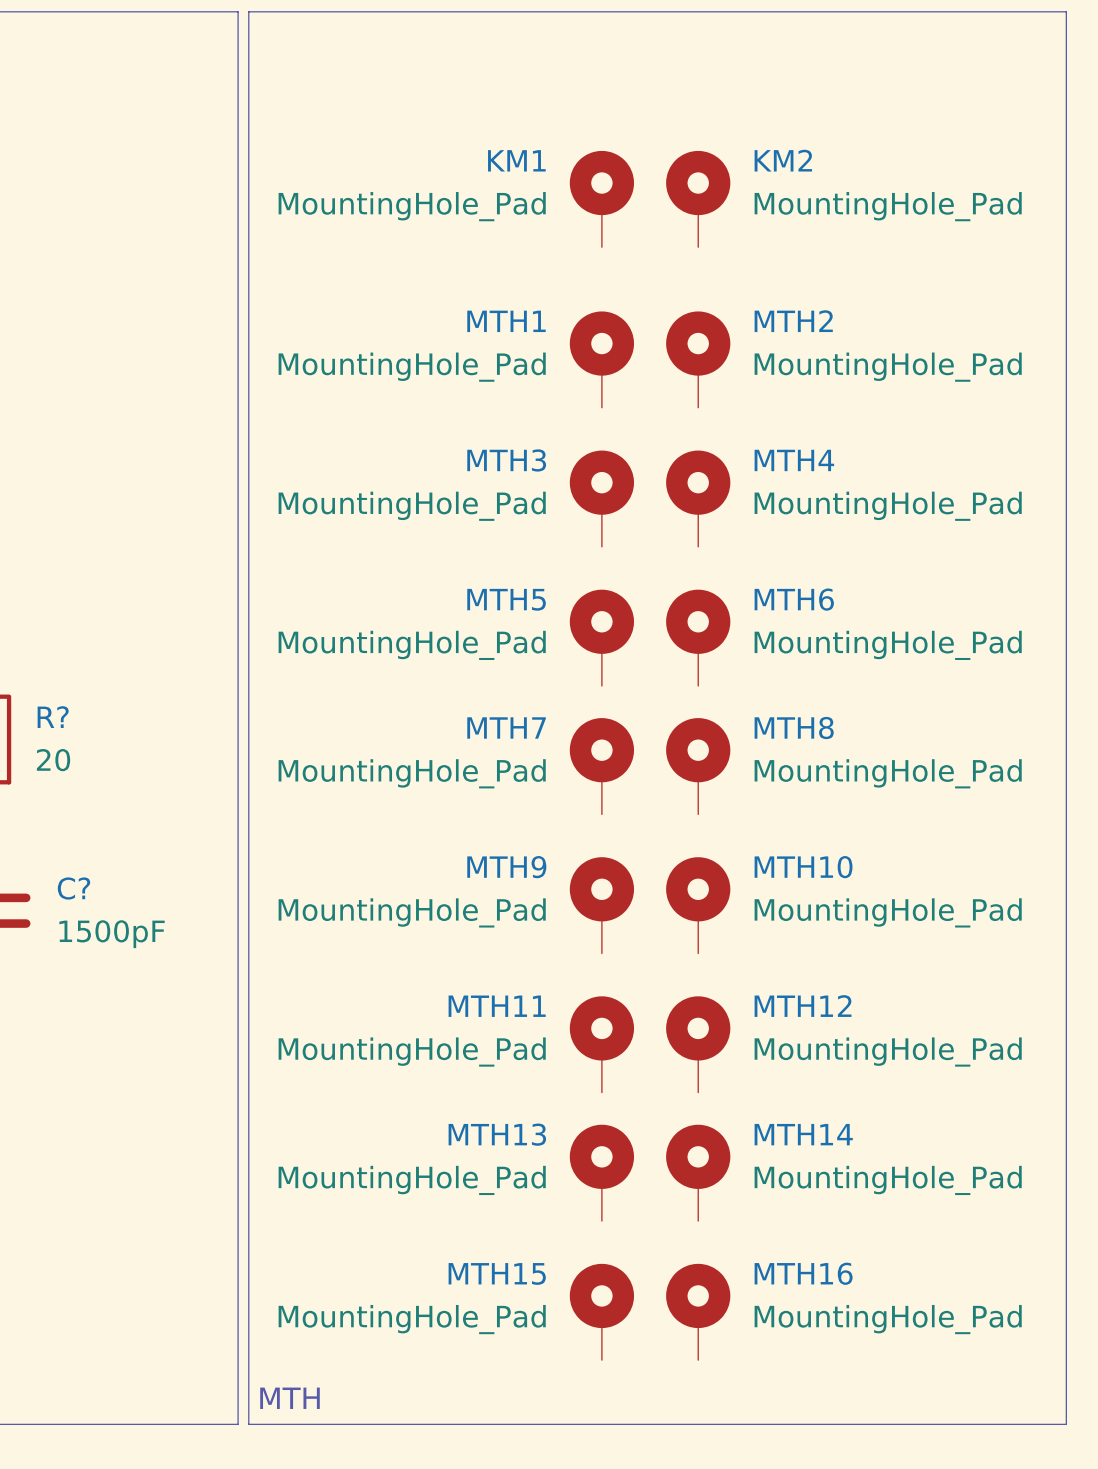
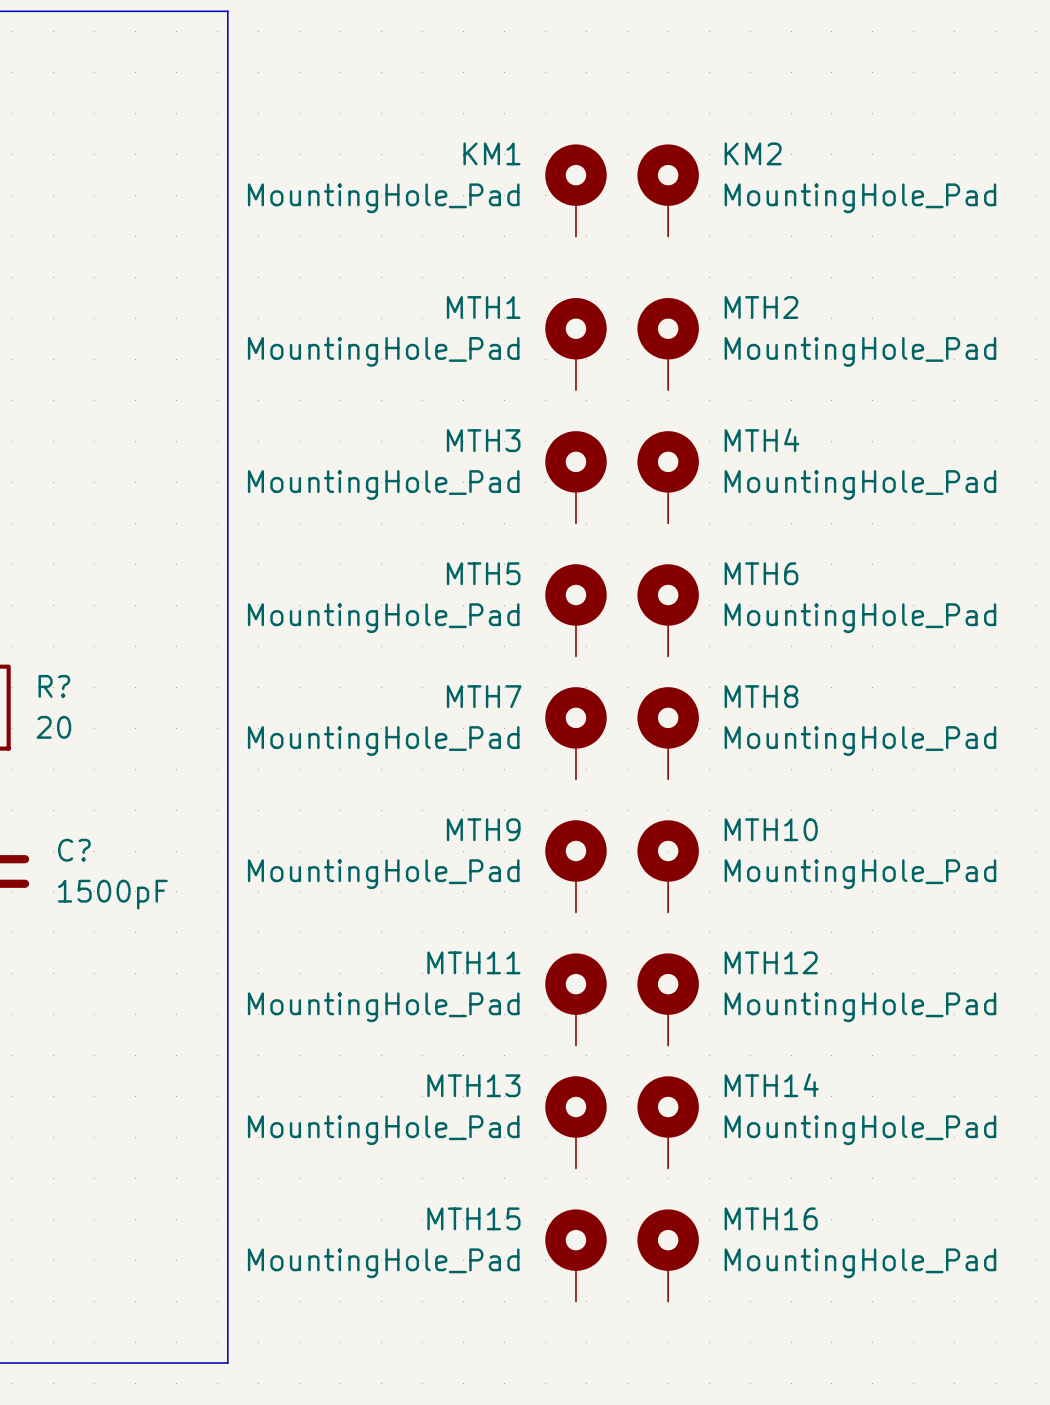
line: (248, 11) (1066, 11) (1066, 1424) (248, 1424) (248, 11) -> none
text: MTH (290, 1398) -> none

